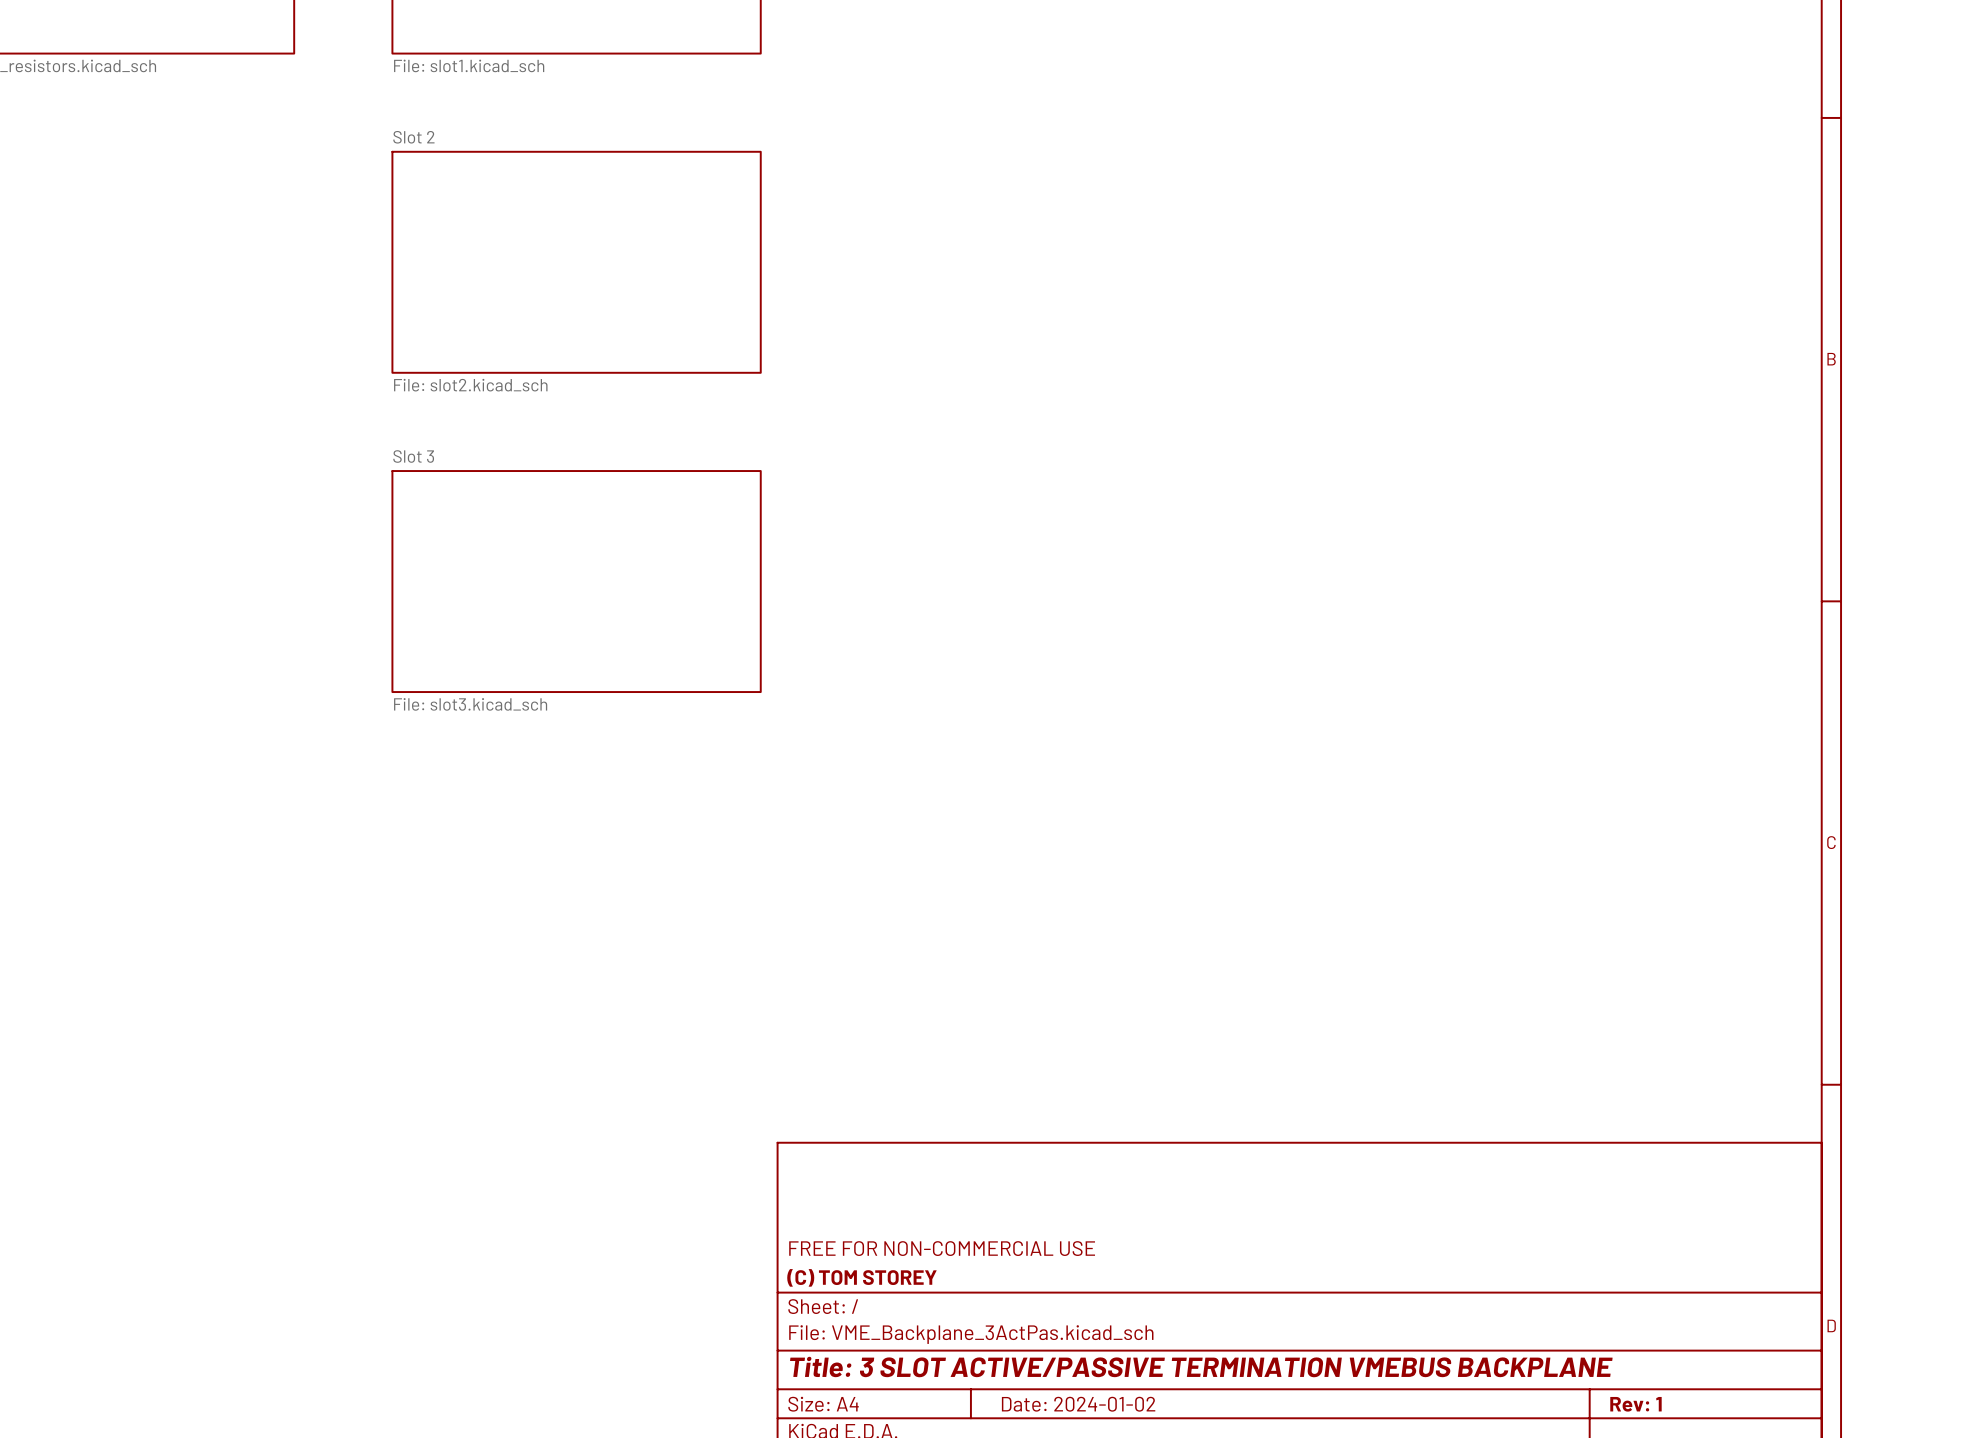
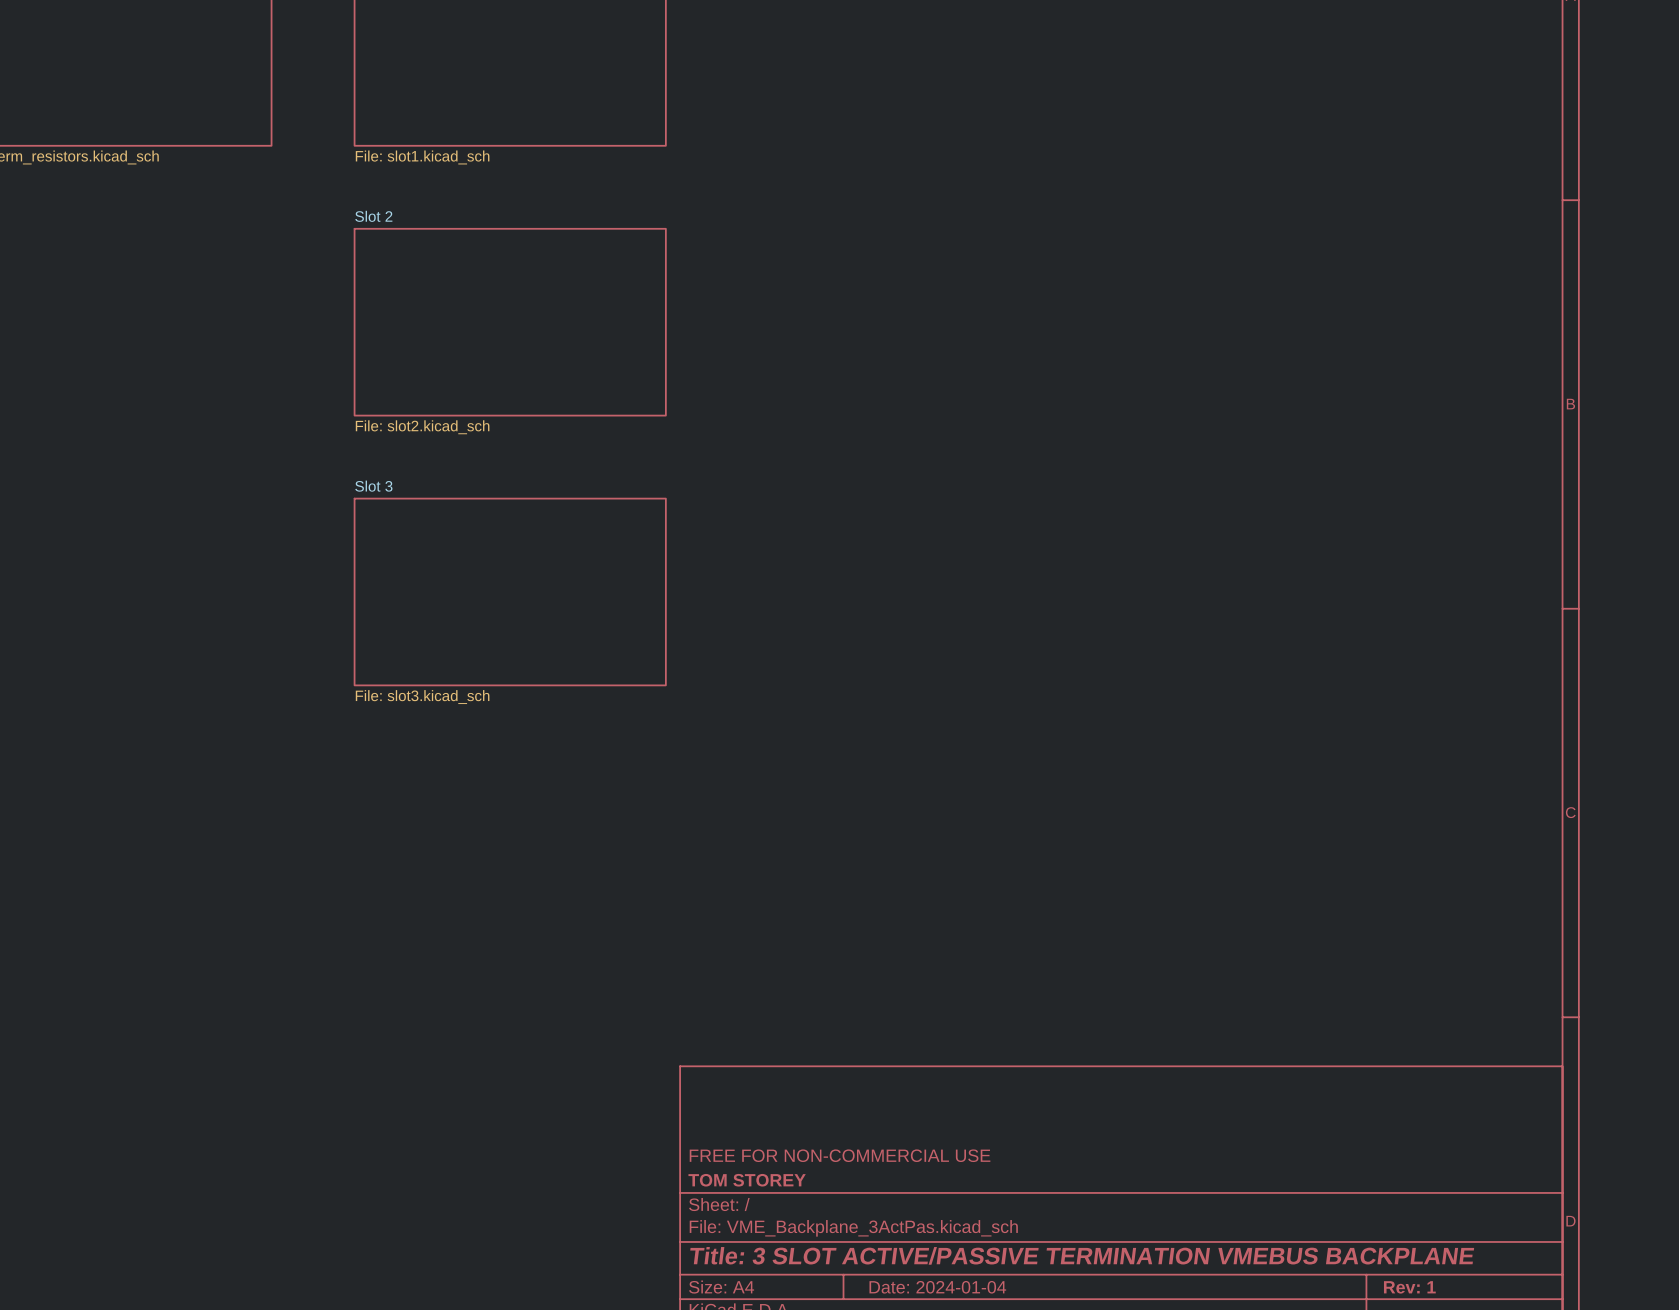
title block: (C) TOM STOREY (861, 1277) -> TOM STOREY (747, 1180)
title block: Date: 2024-01-02 (1078, 1404) -> Date: 2024-01-04 (937, 1287)

